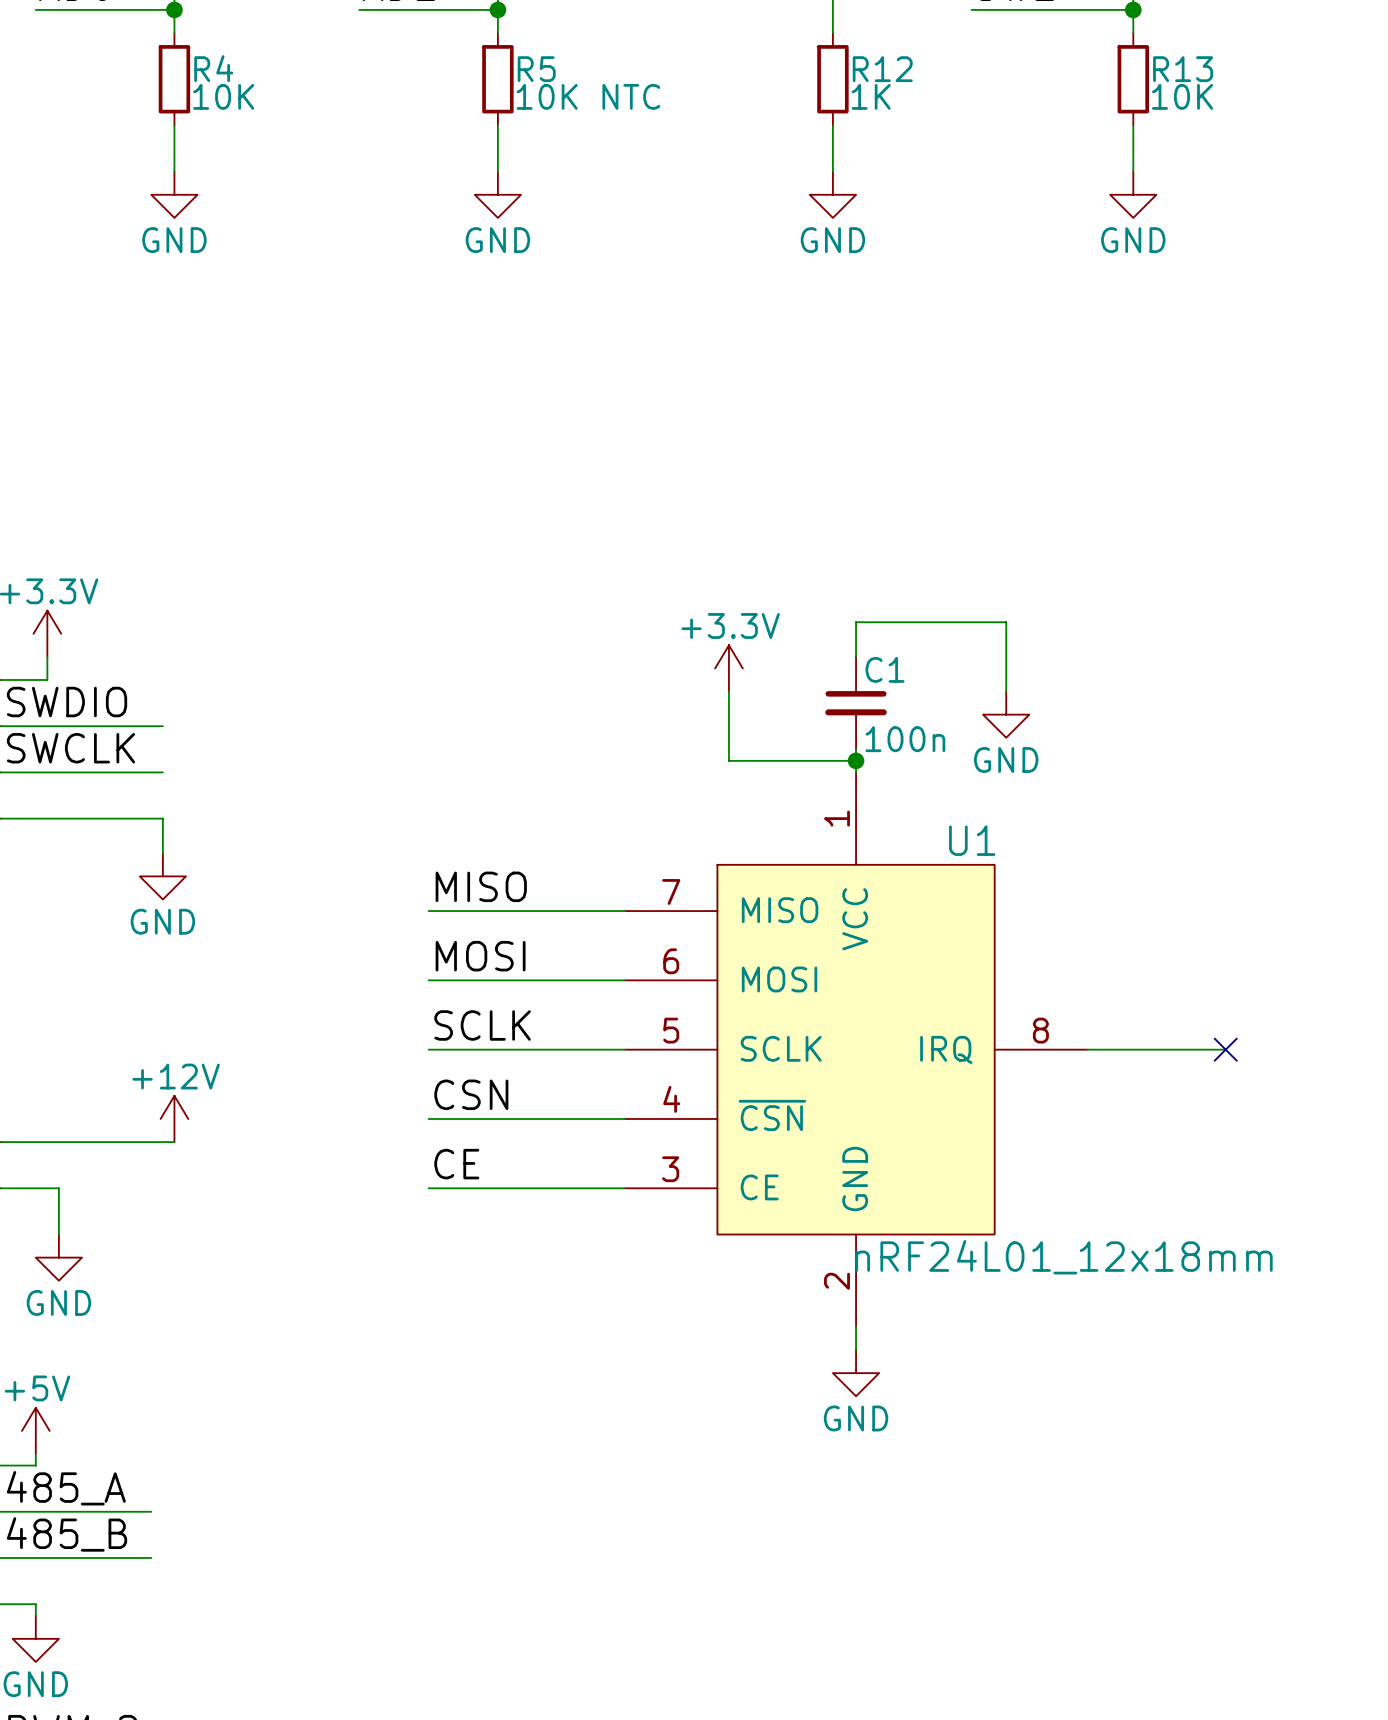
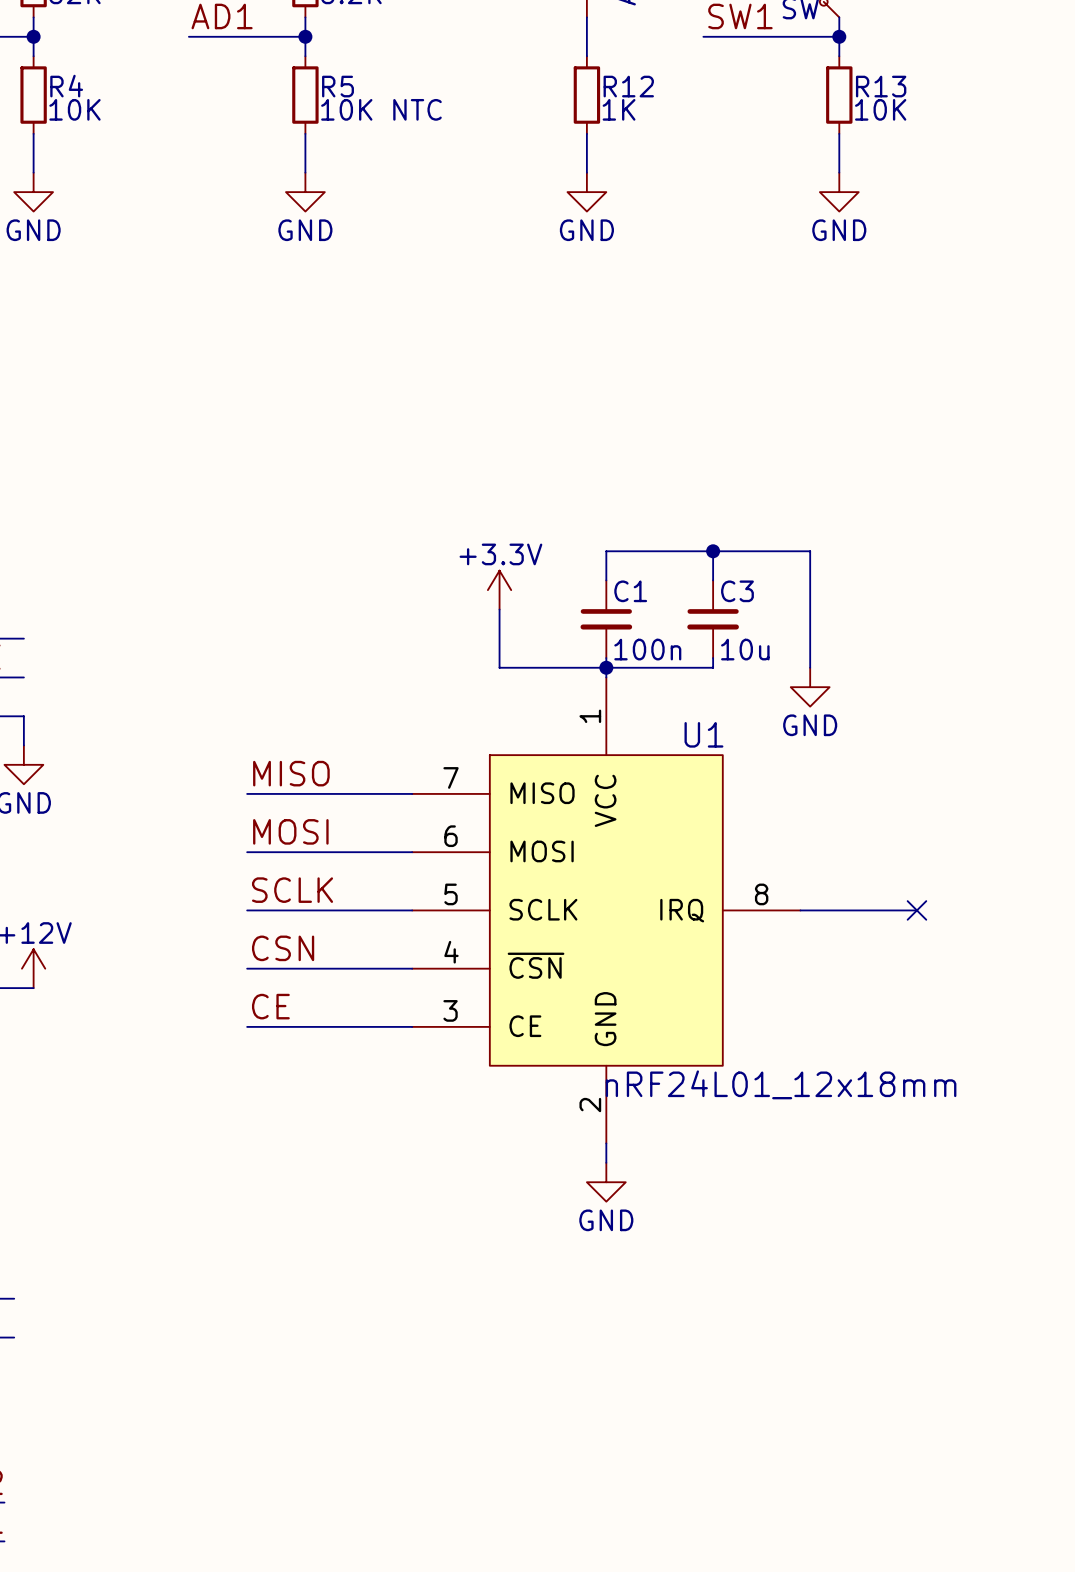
wire: none -> (713, 551) (713, 580)
junction: none -> (713, 551)
wire: (1006, 622) (1006, 691) -> (732, 551) (810, 551) (810, 667)
C3: none -> 10u (713, 619)
power symbol position: GND (1006, 714) -> GND (810, 687)
wire: none -> (713, 658) (713, 667) (606, 667)

